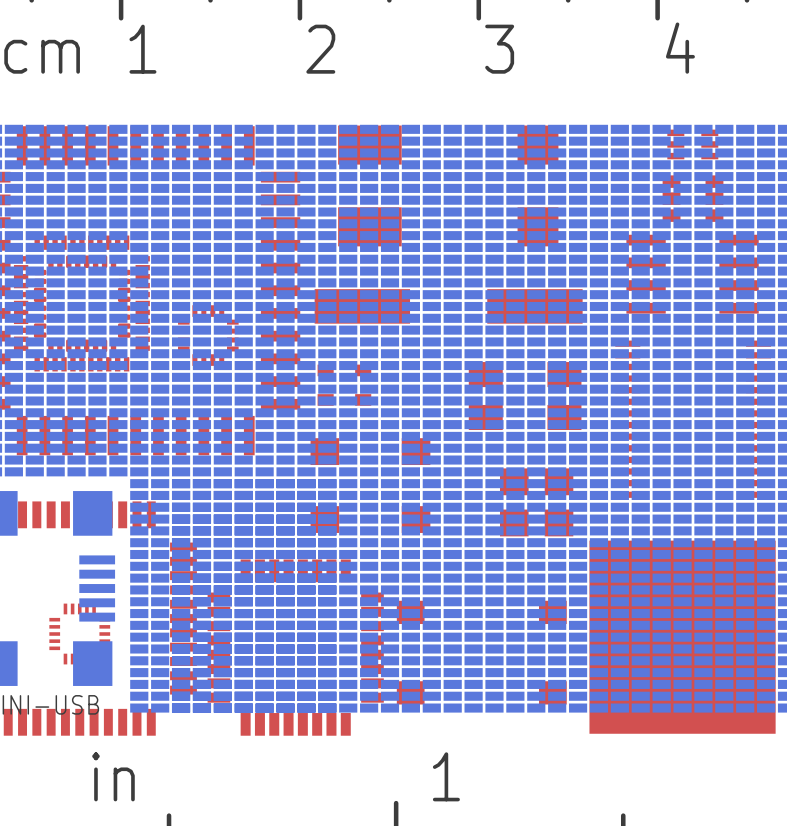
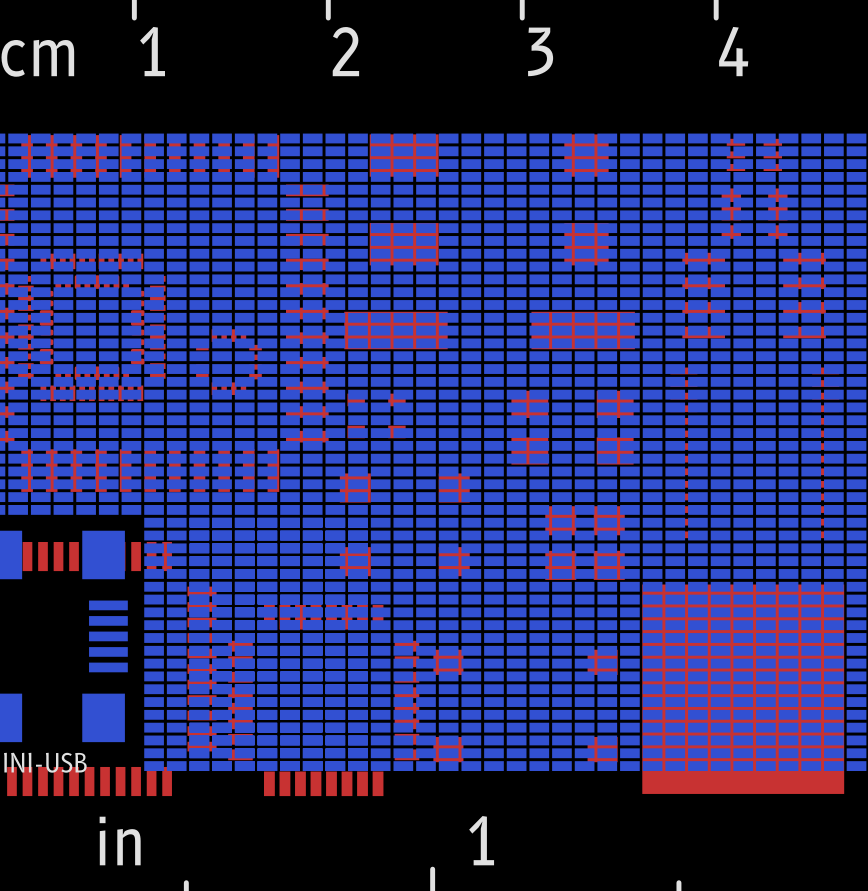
part: (79, 634) -> none

